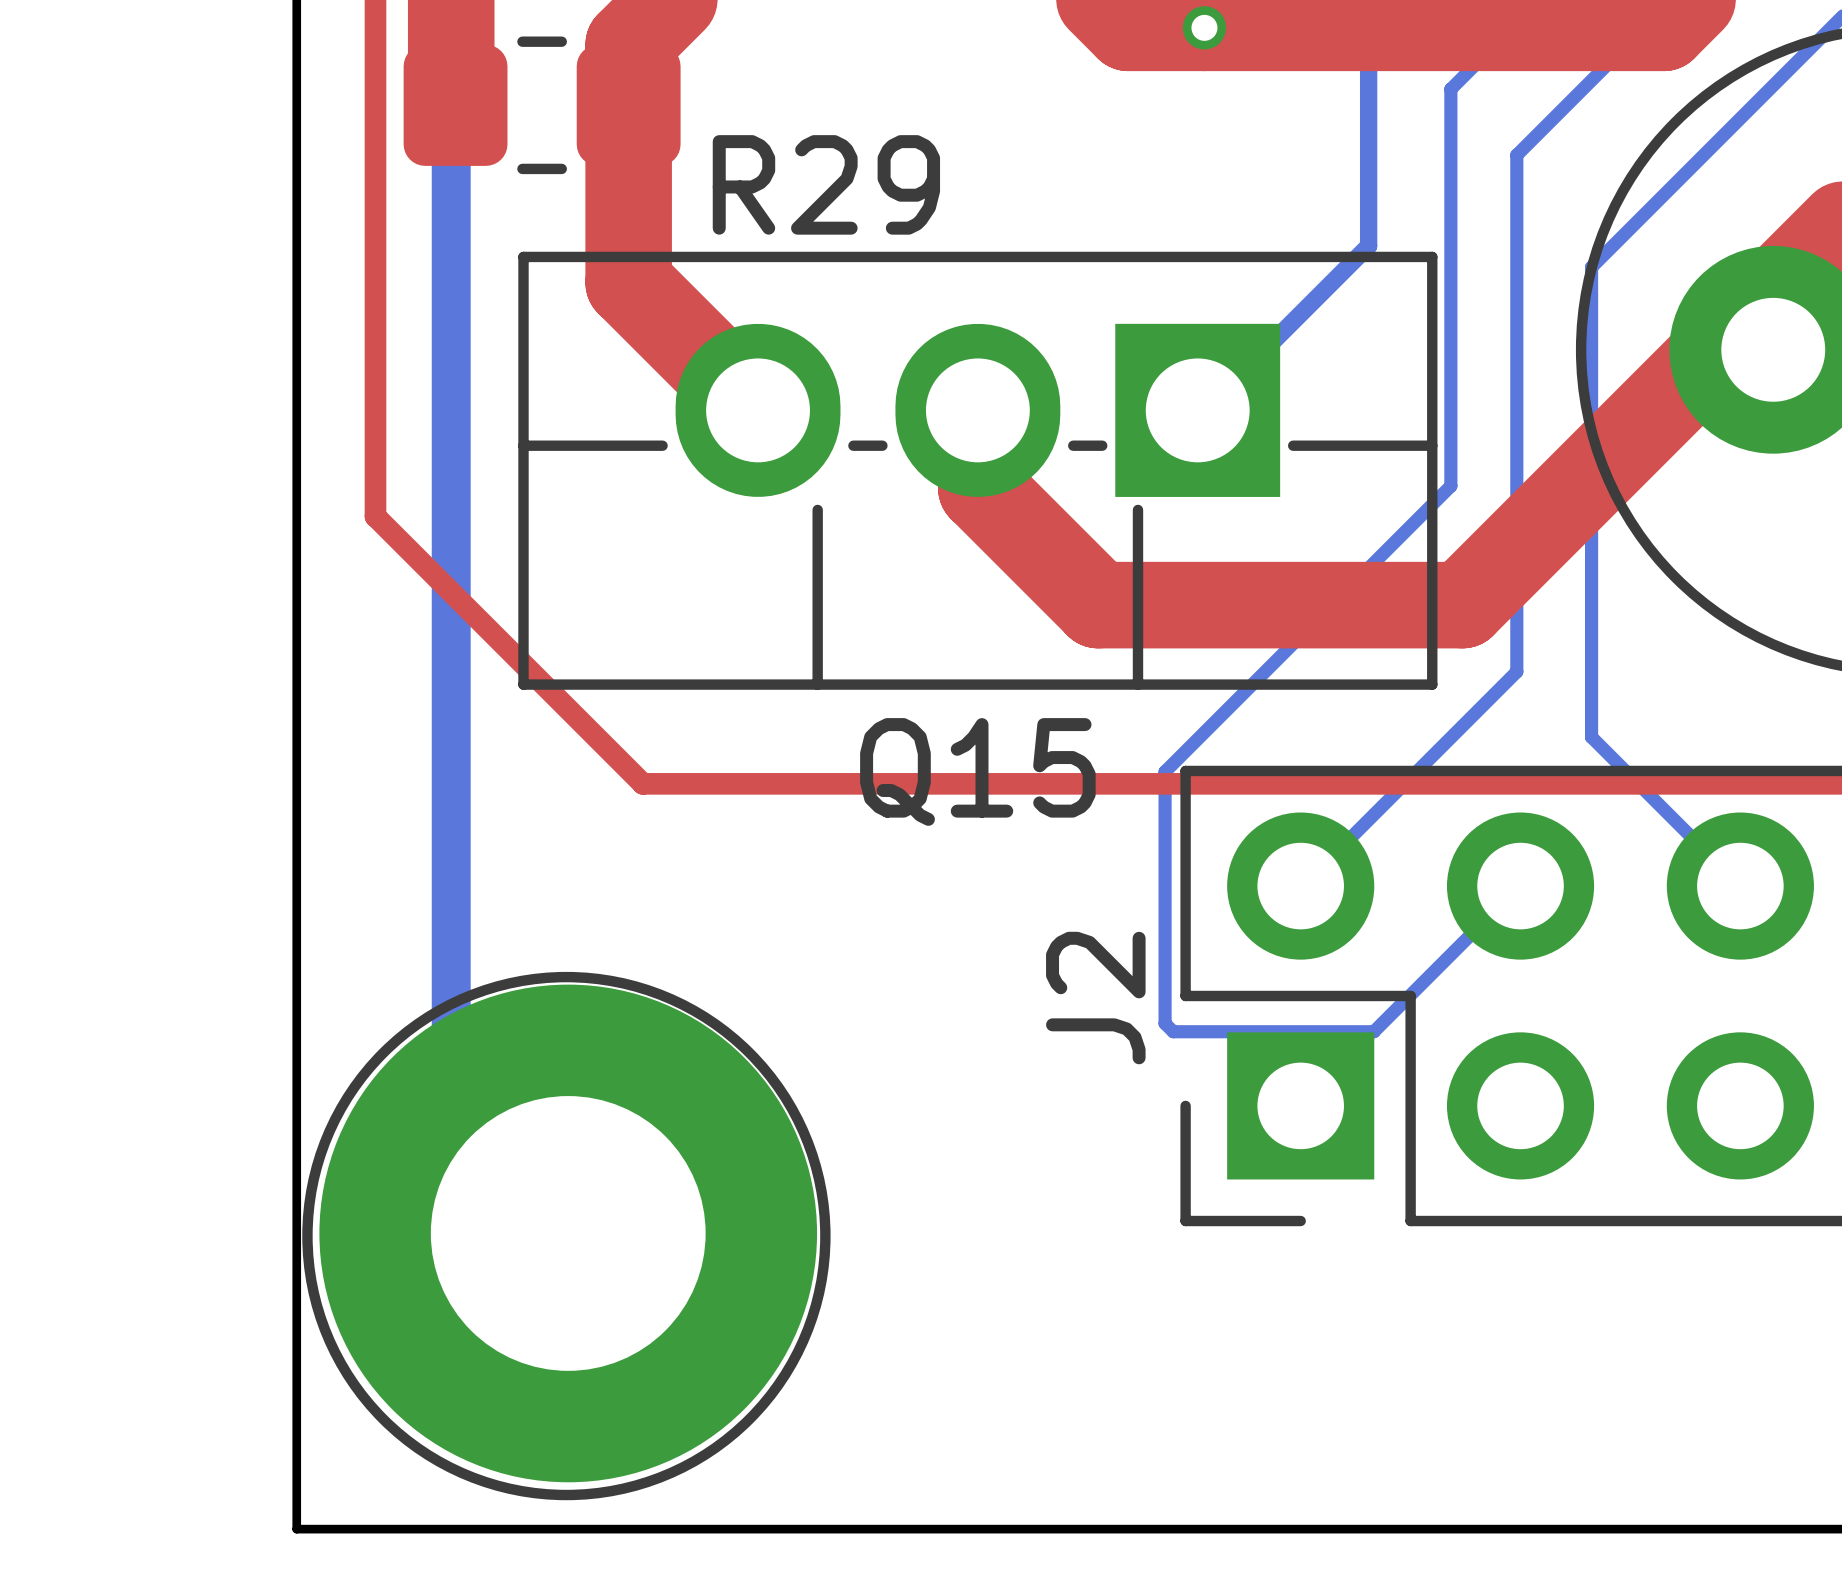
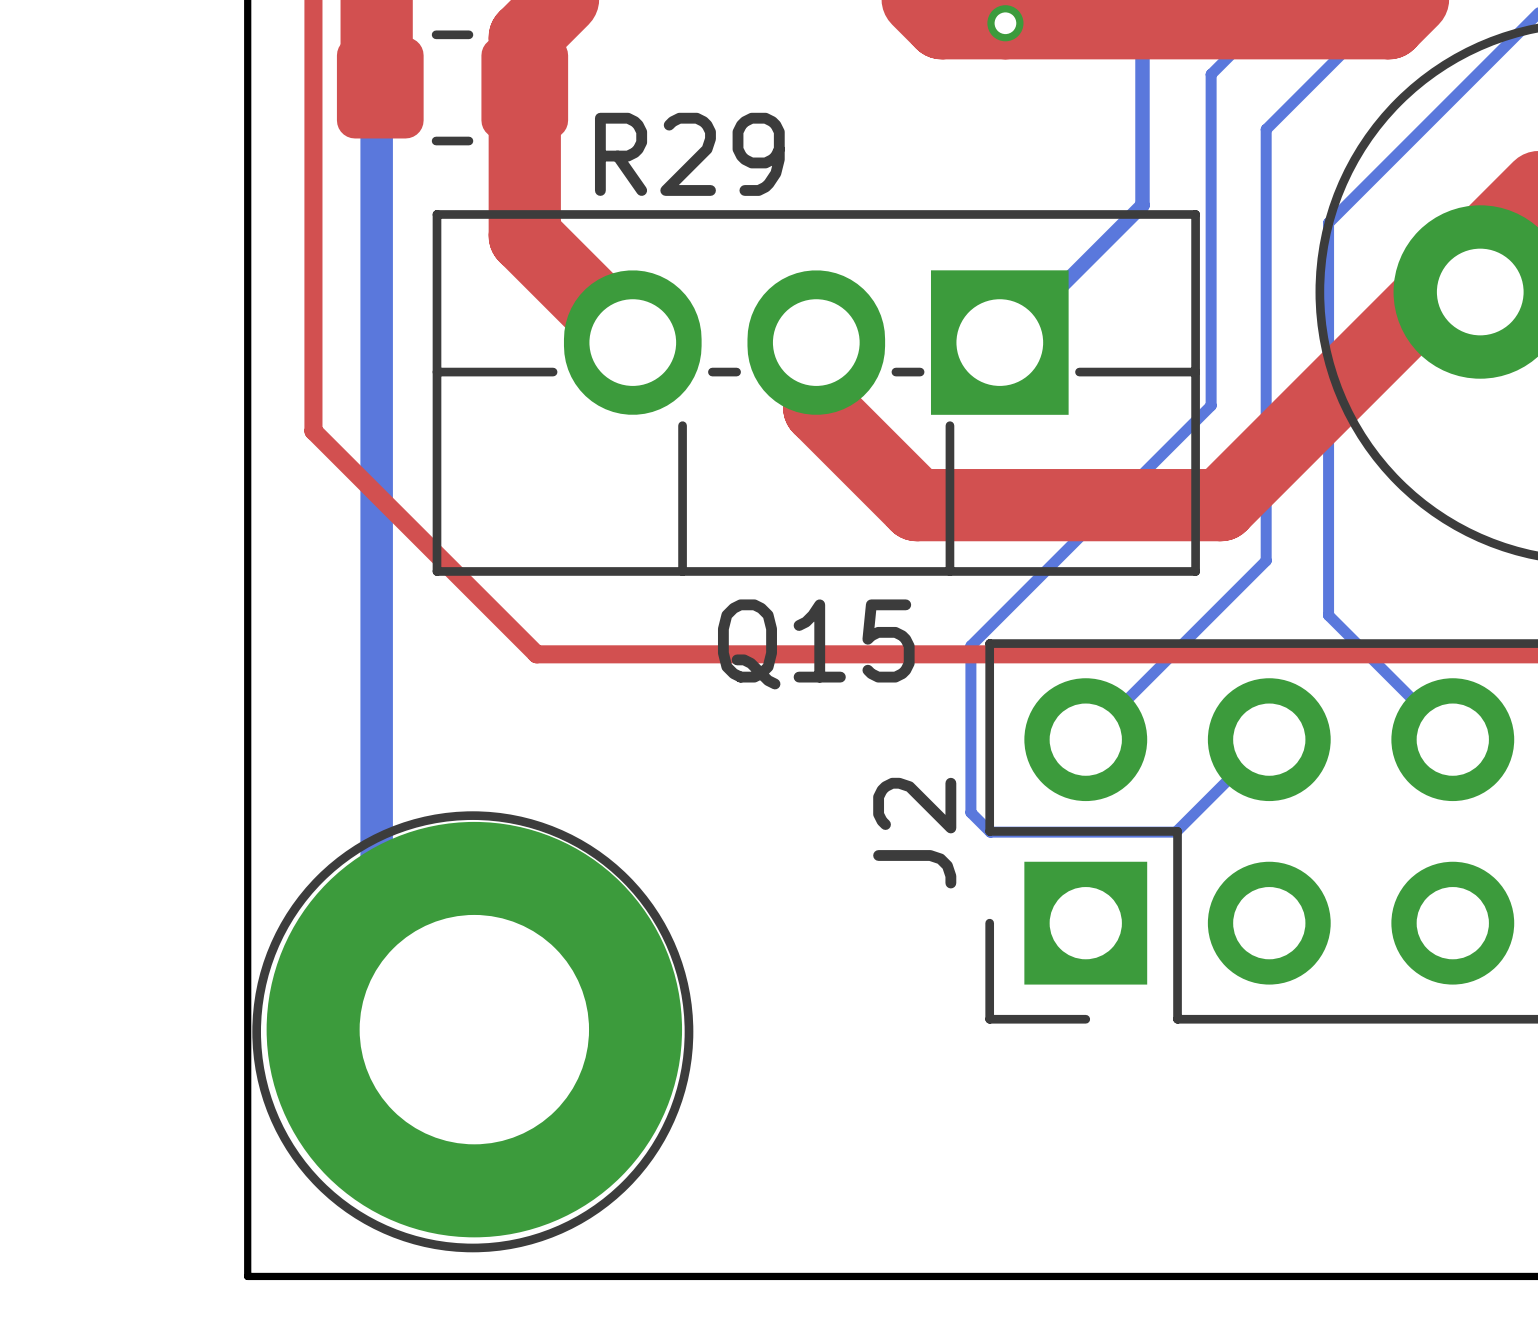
bottom track: (1165, 771) (1165, 1023) (1173, 1031) (1373, 1031) (1408, 996) -> (972, 644) (970, 645) (970, 812) (990, 832) (1176, 832)

